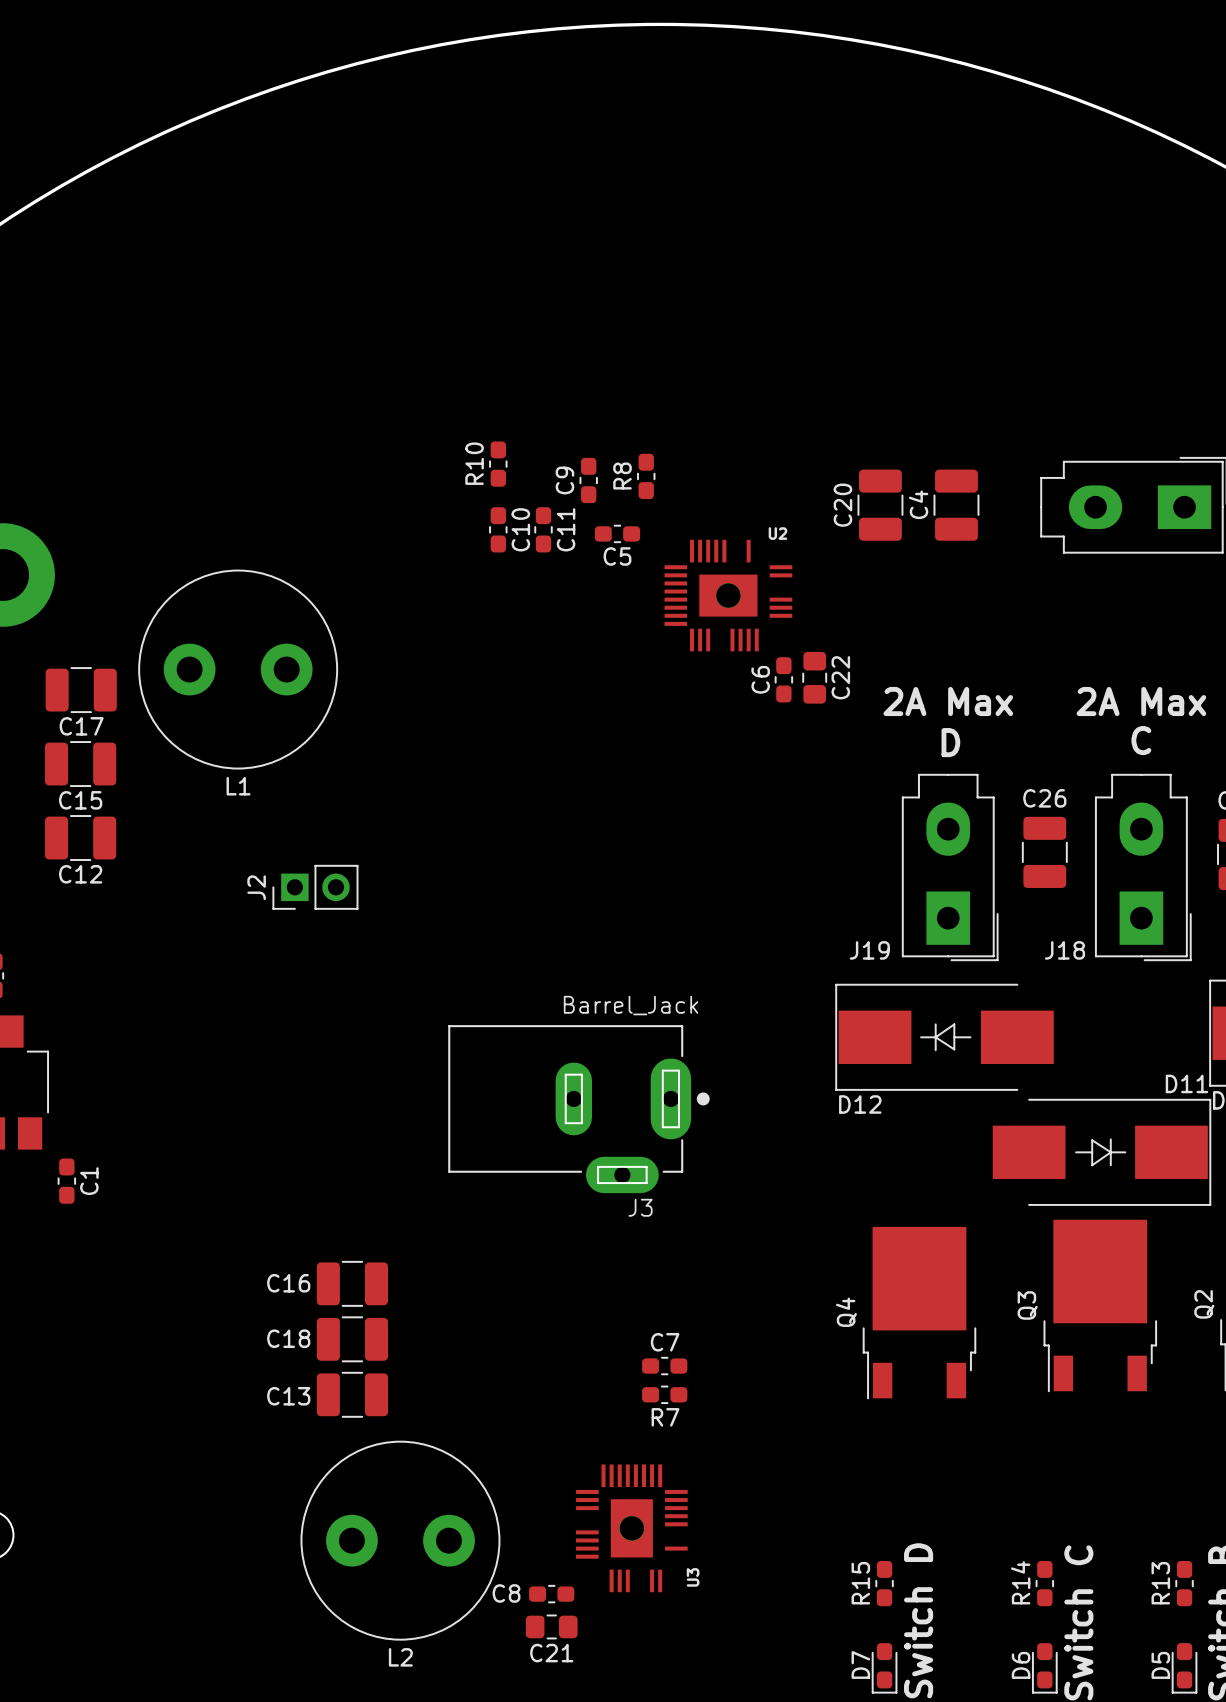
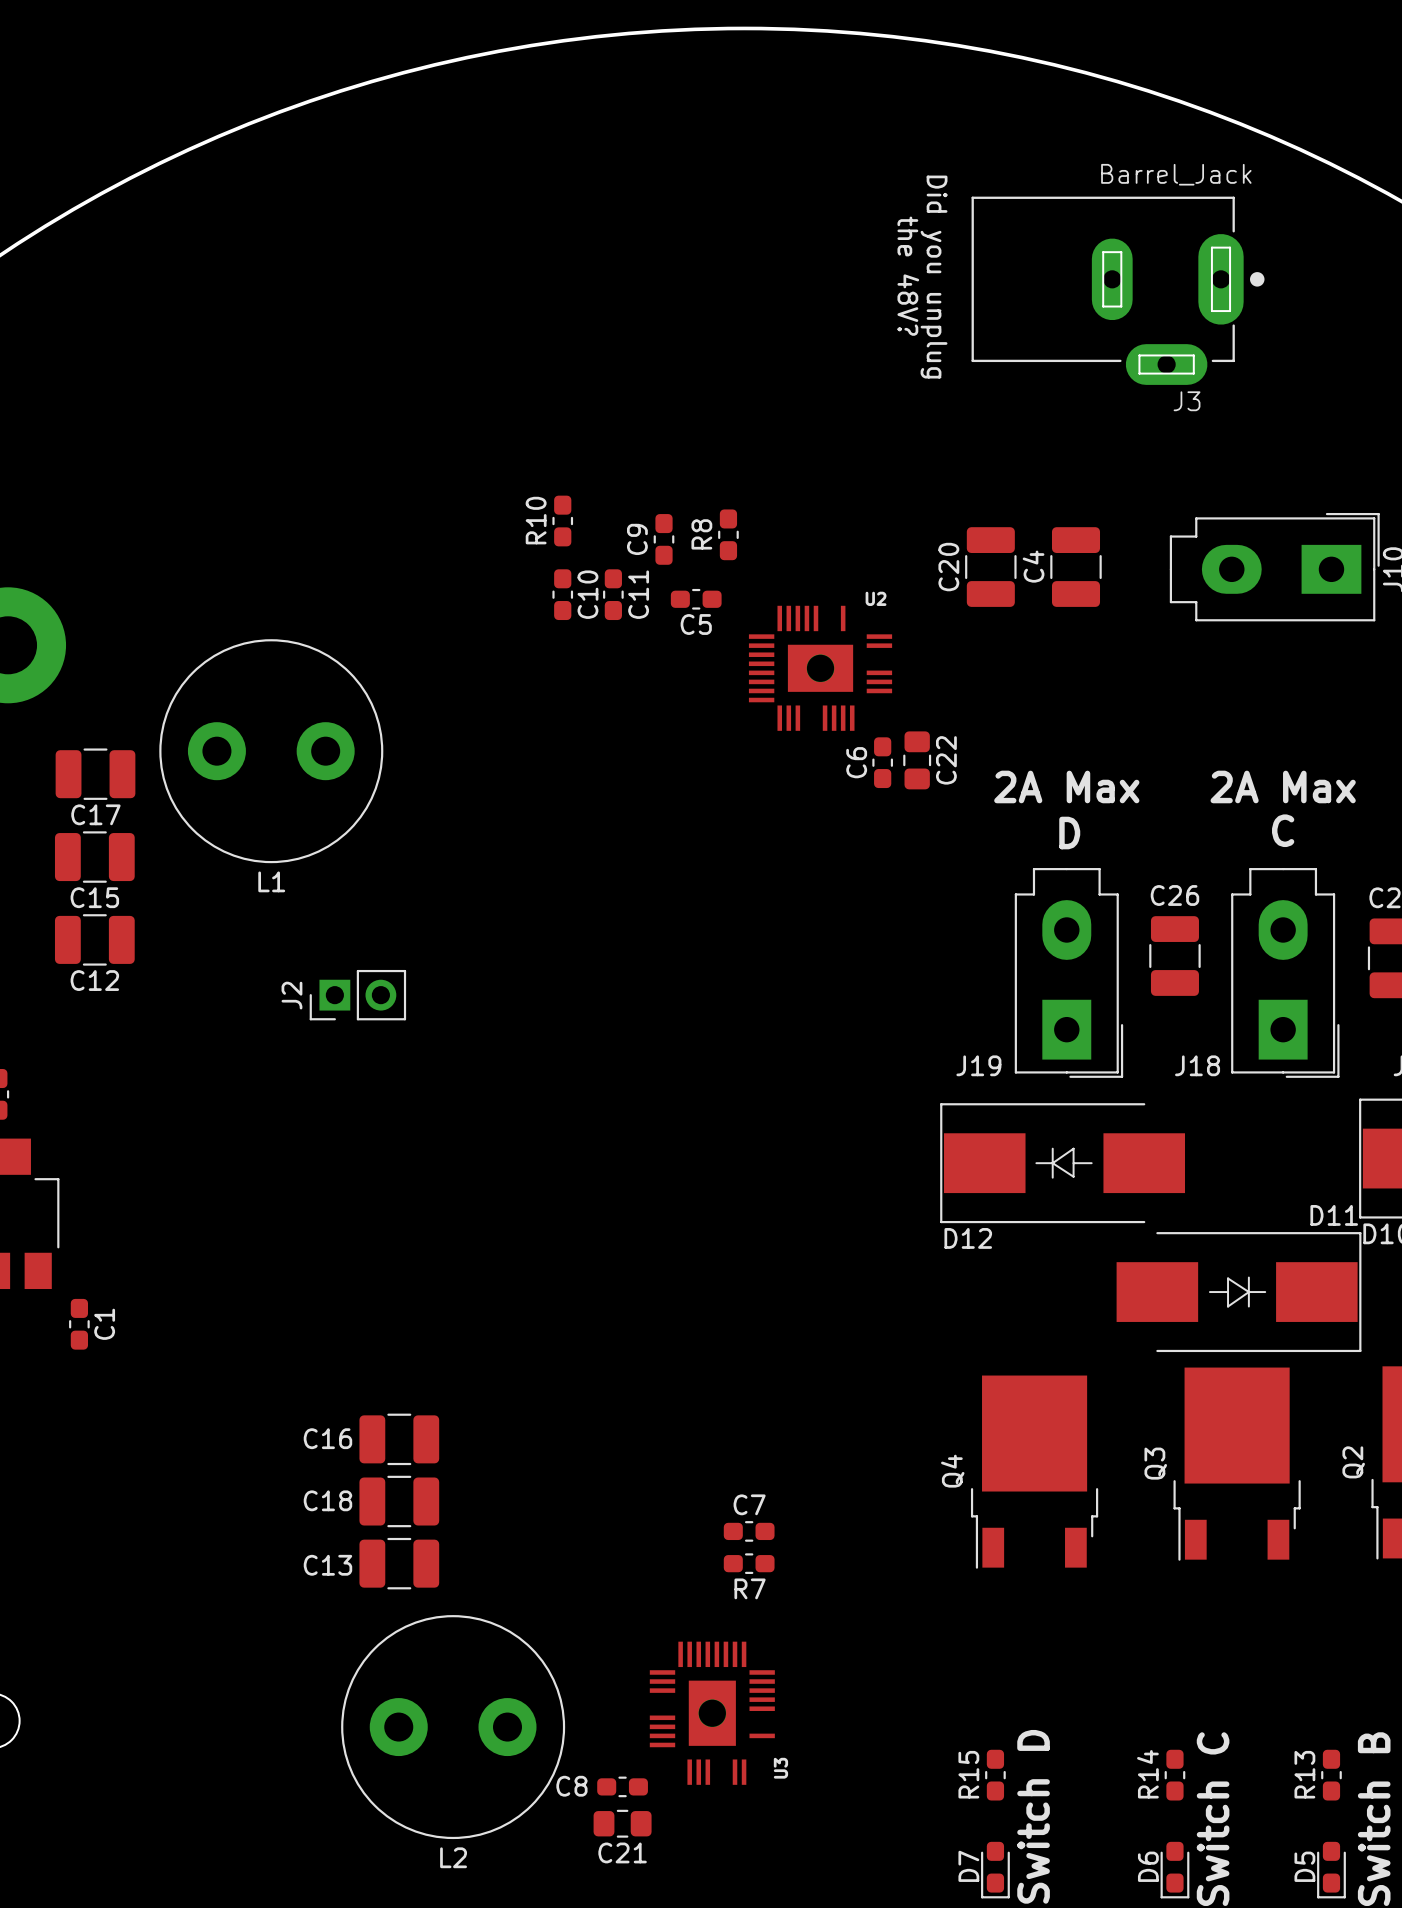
text: none -> the 48V? (908, 276)
text: none -> Did you unplug (934, 277)
J3 position: (578, 1109) -> (1118, 290)

